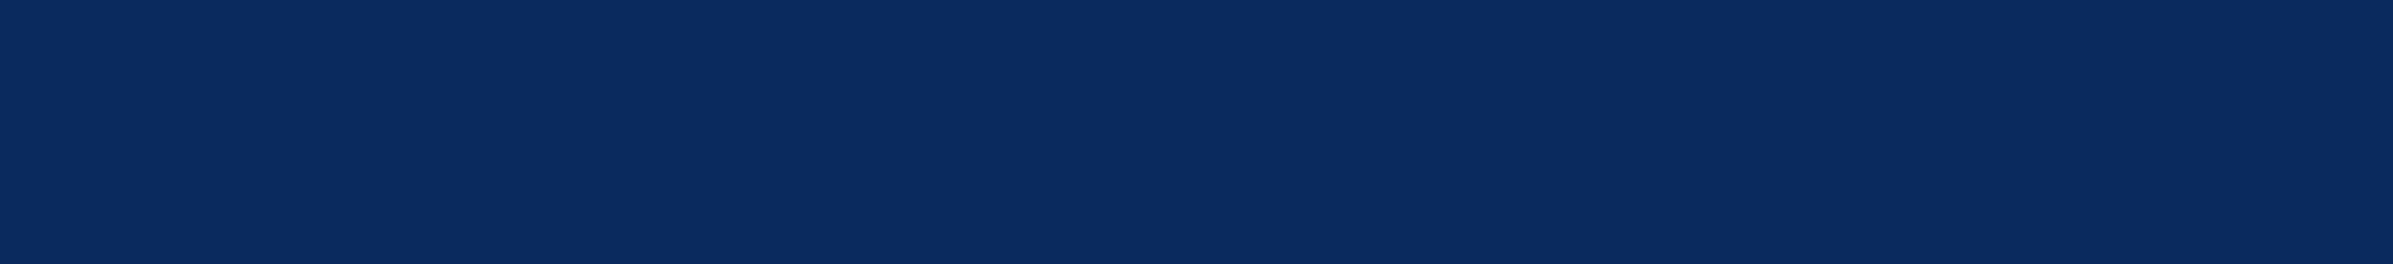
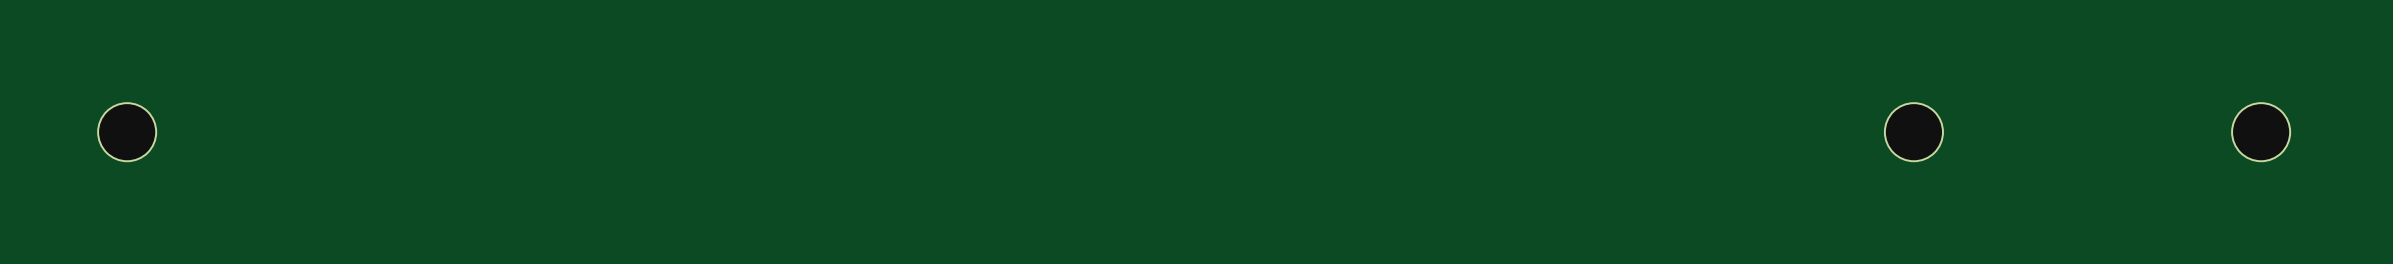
part: none -> (127, 132)
part: none -> (1913, 132)
part: none -> (2261, 132)

